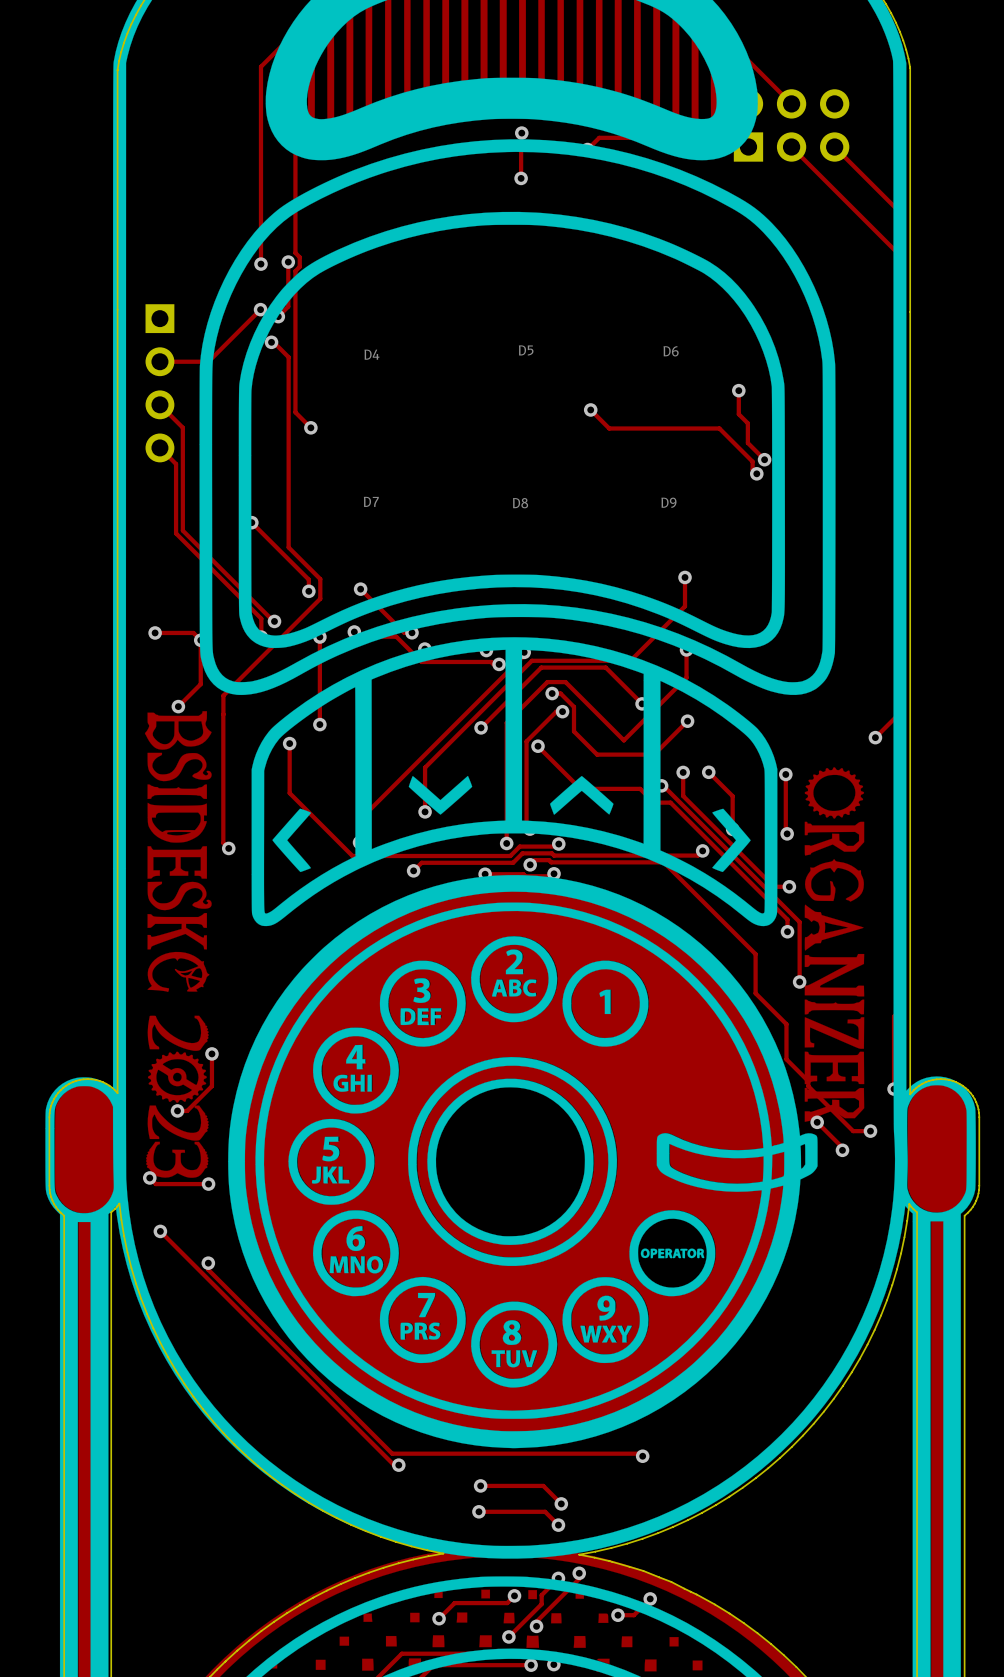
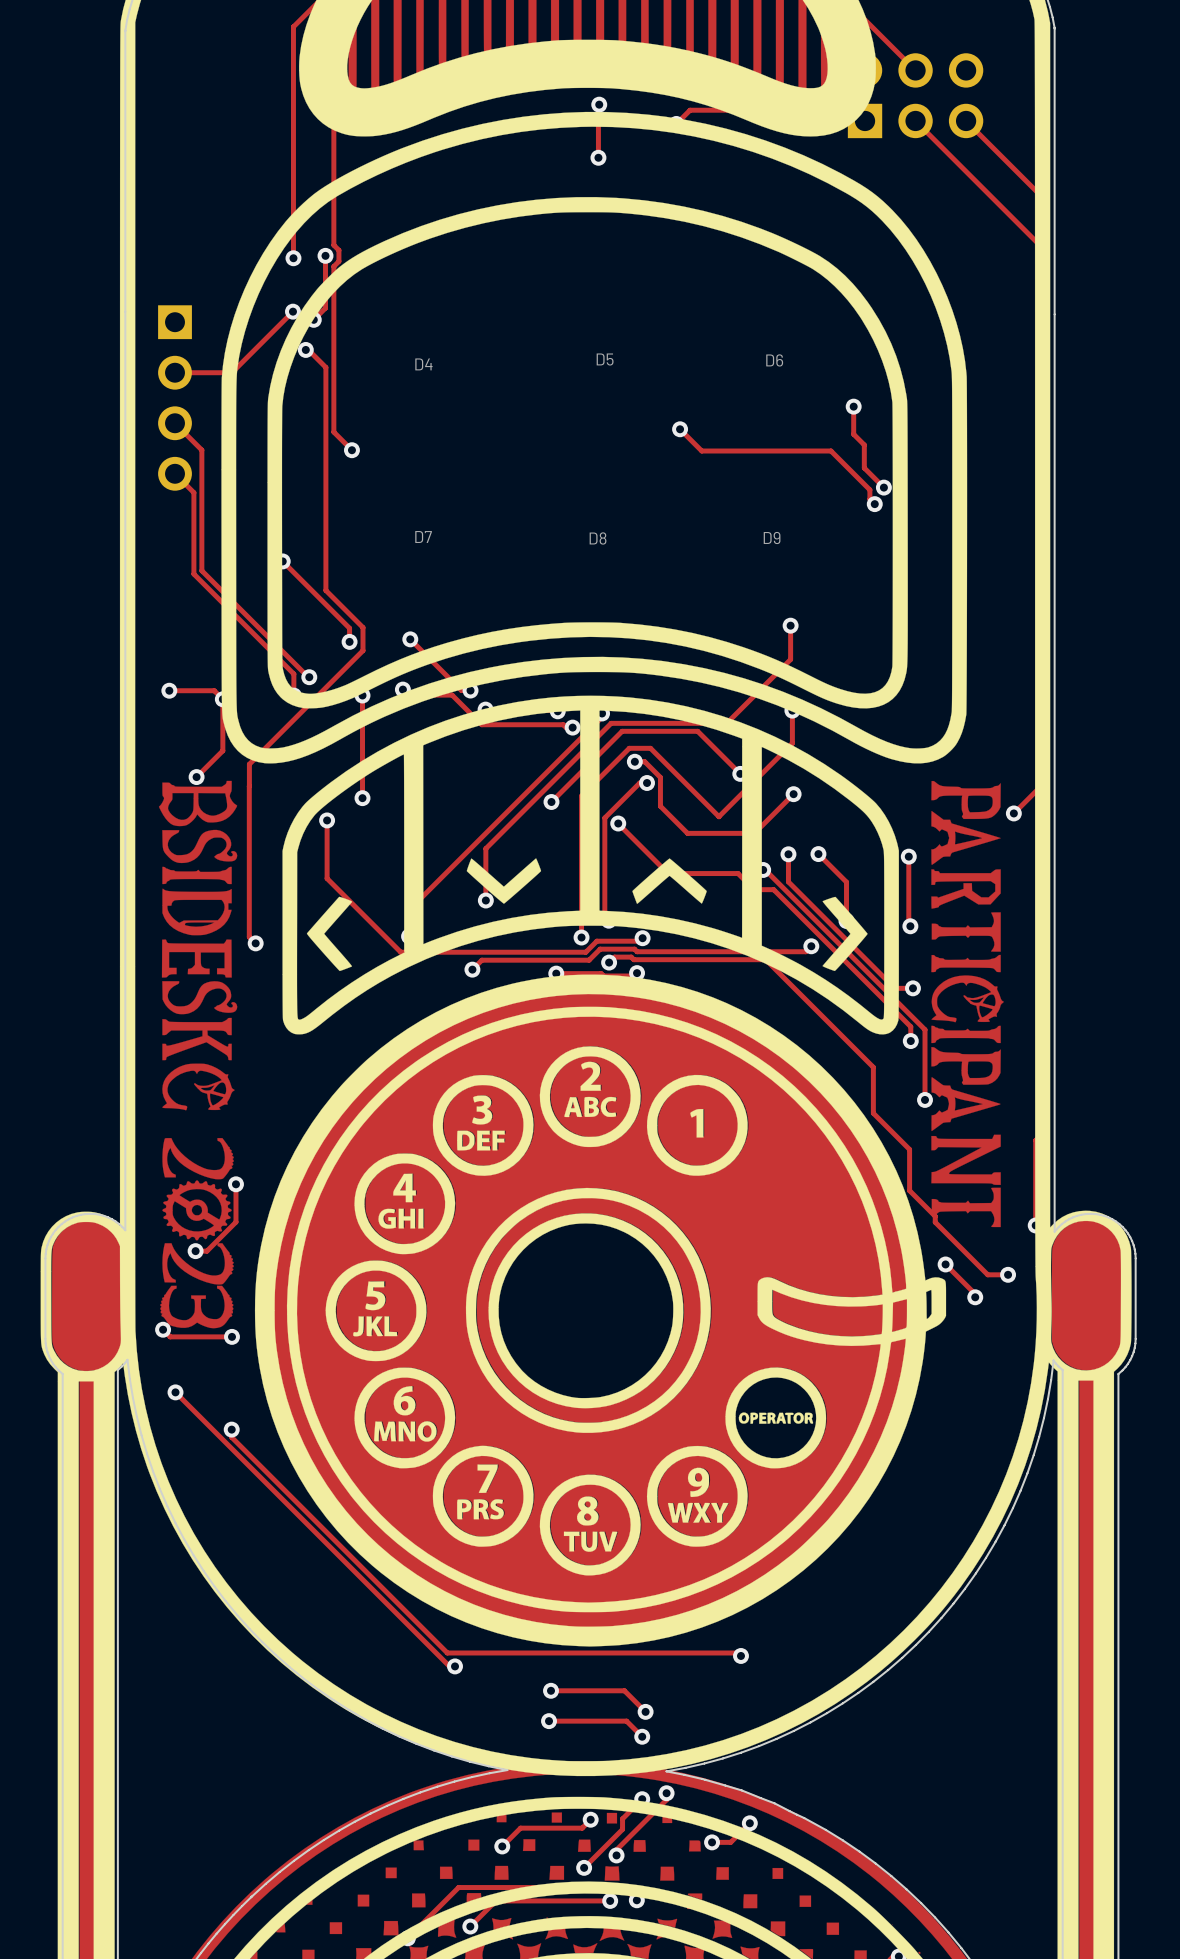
drawing shape: [144, 711, 865, 1178] -> [158, 780, 1004, 1329]

